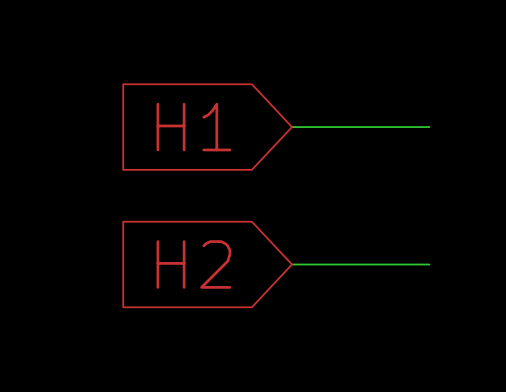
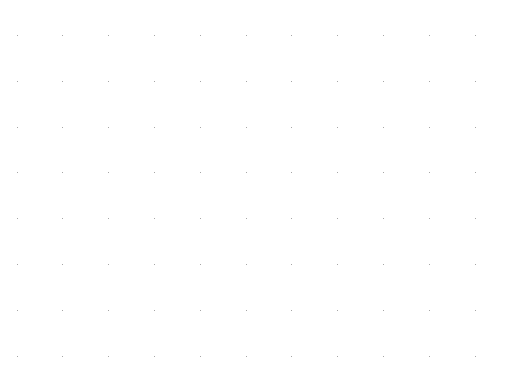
global label: H1 (193, 127) -> none
wire: (291, 127) (429, 127) -> none
global label: H2 (193, 264) -> none
wire: (291, 264) (429, 264) -> none

